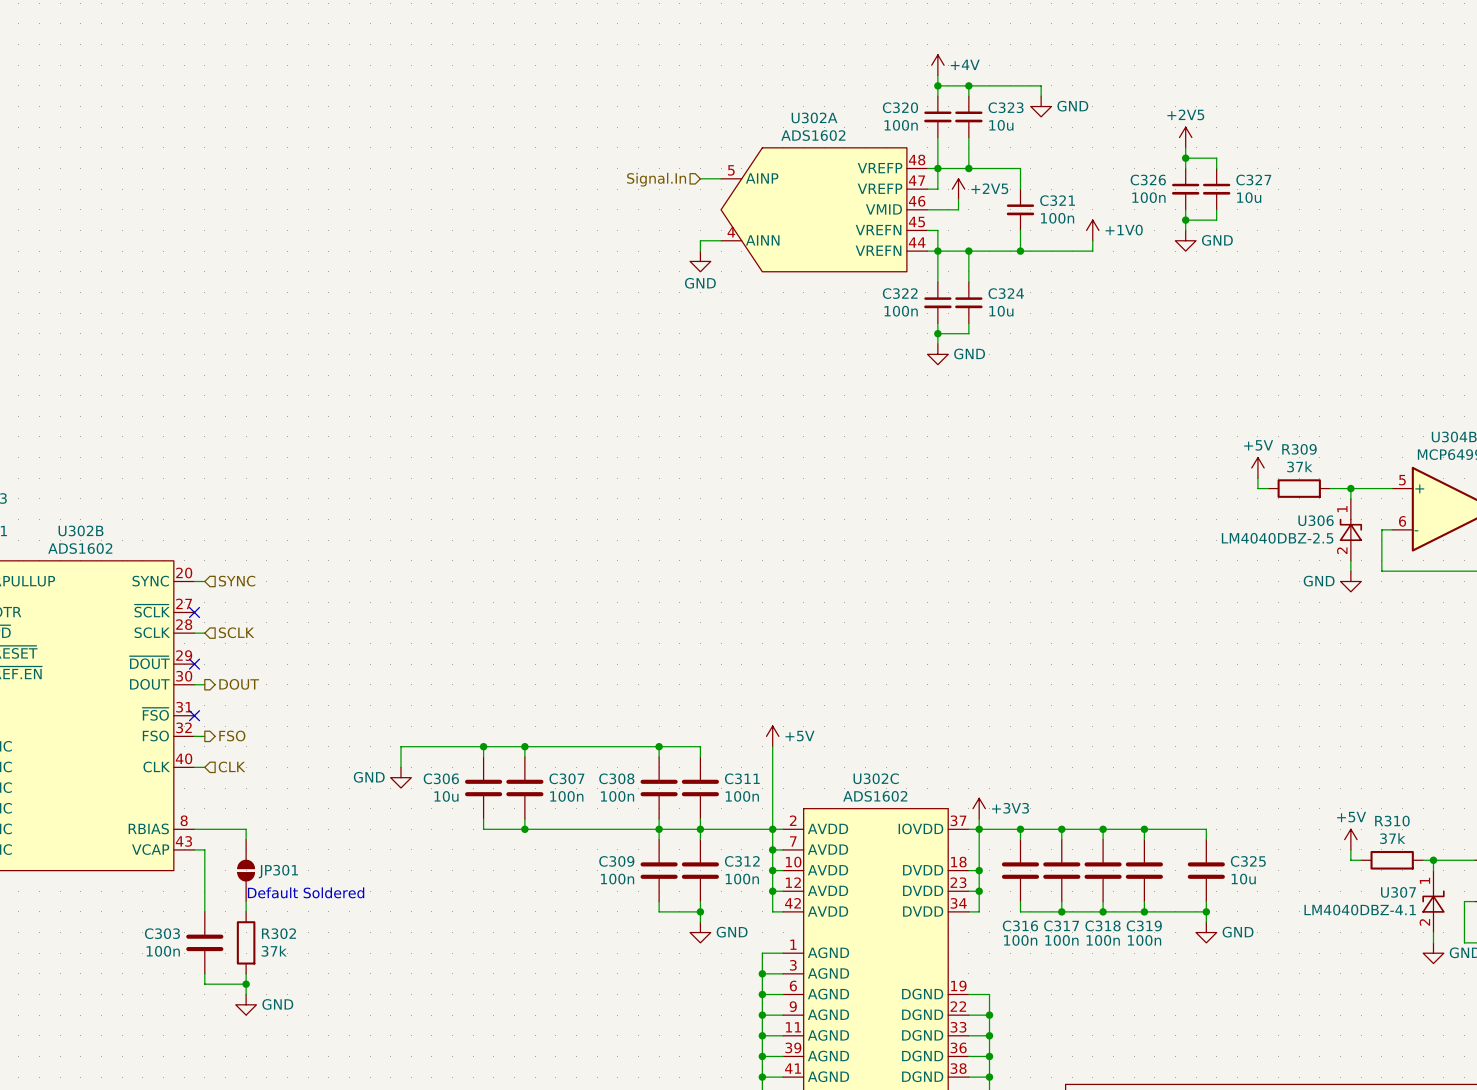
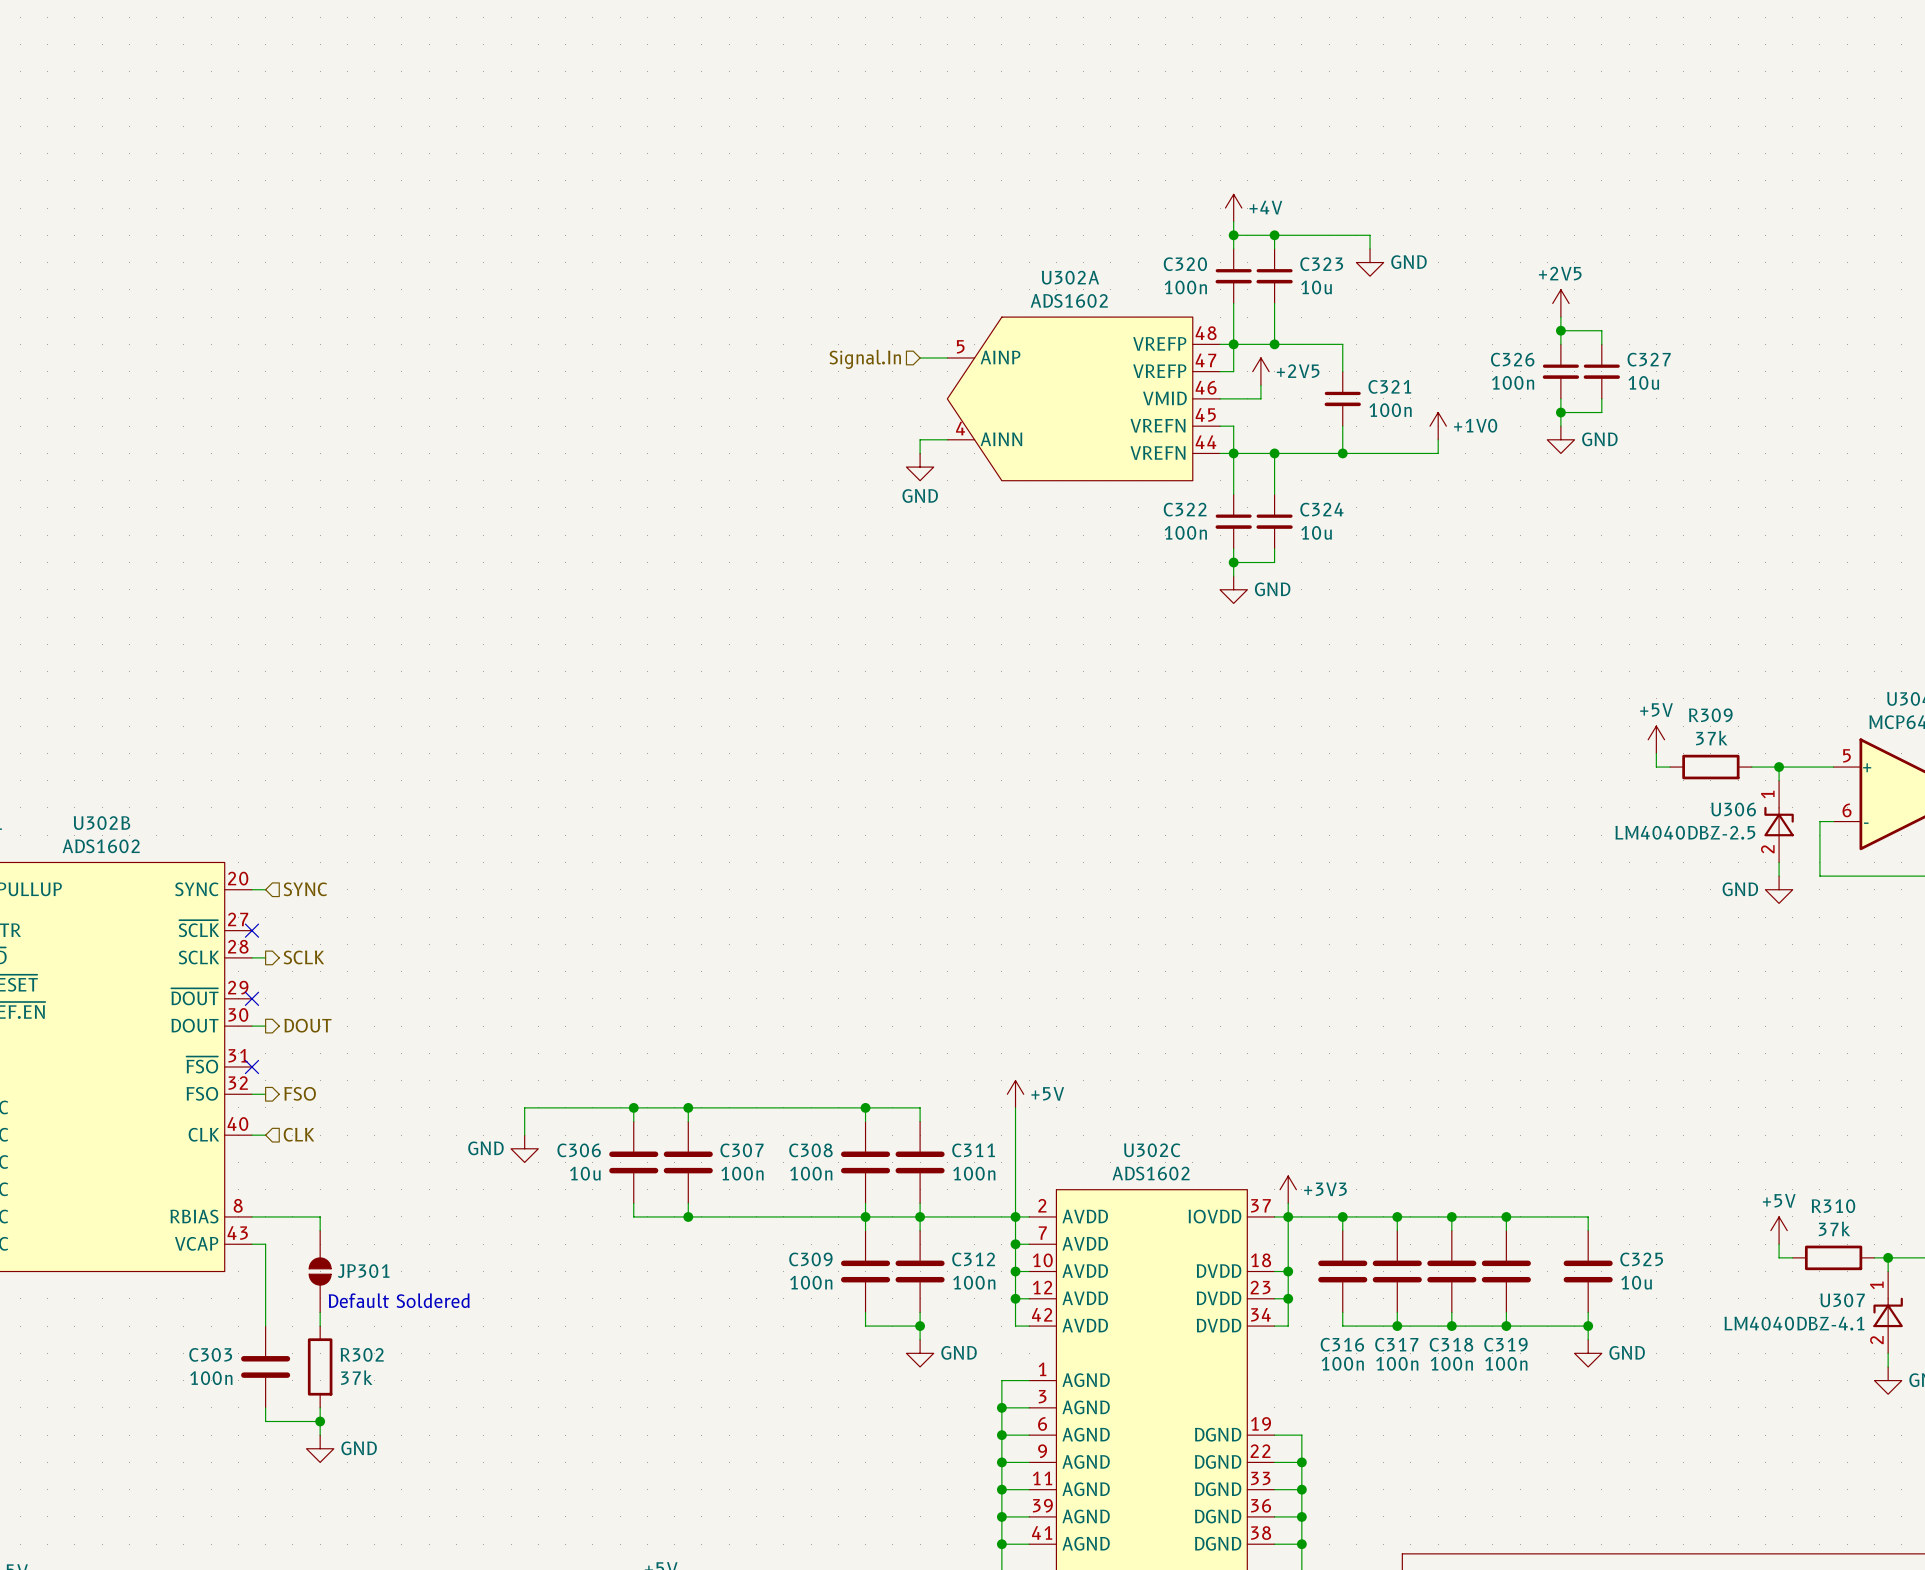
hierarchical label shape: input (236, 632) -> output (303, 957)

